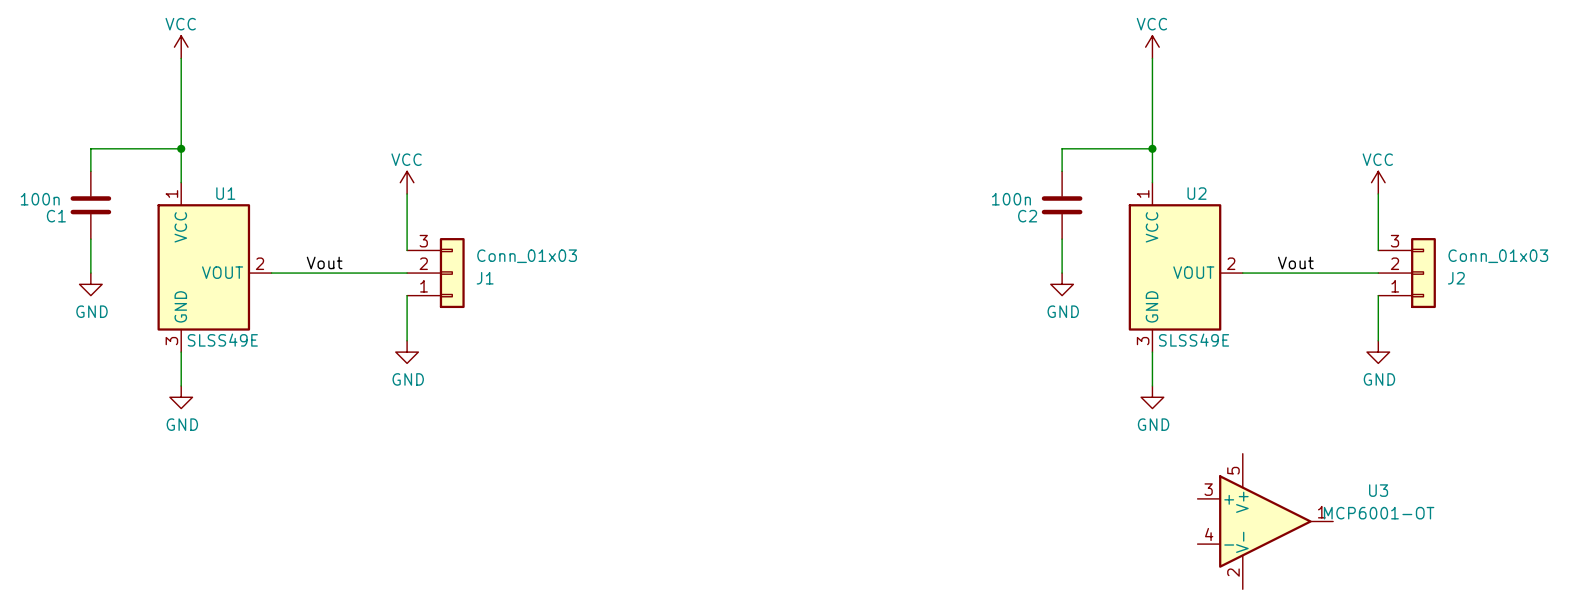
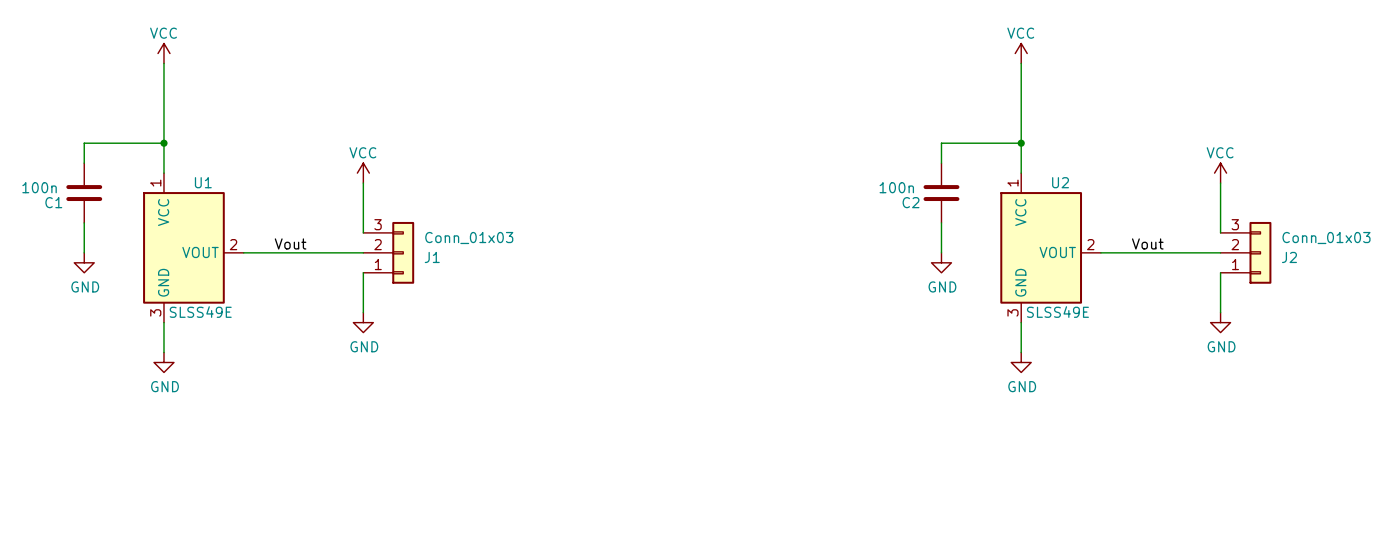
U3: MCP6001-OT (1265, 521) -> none

